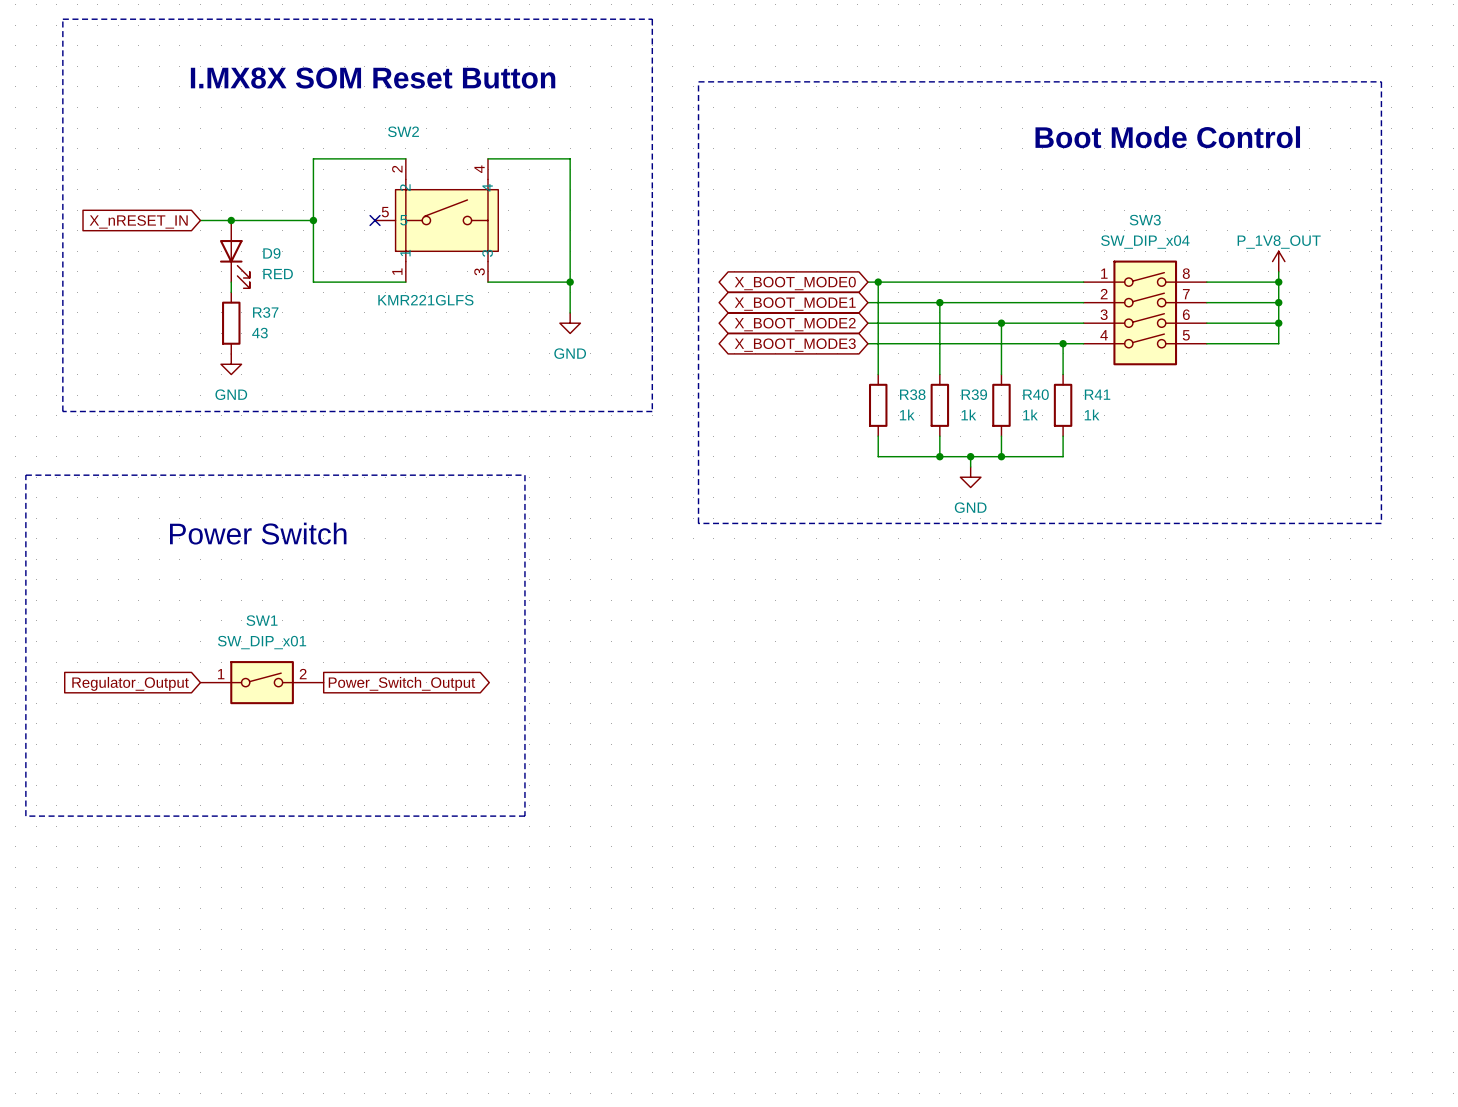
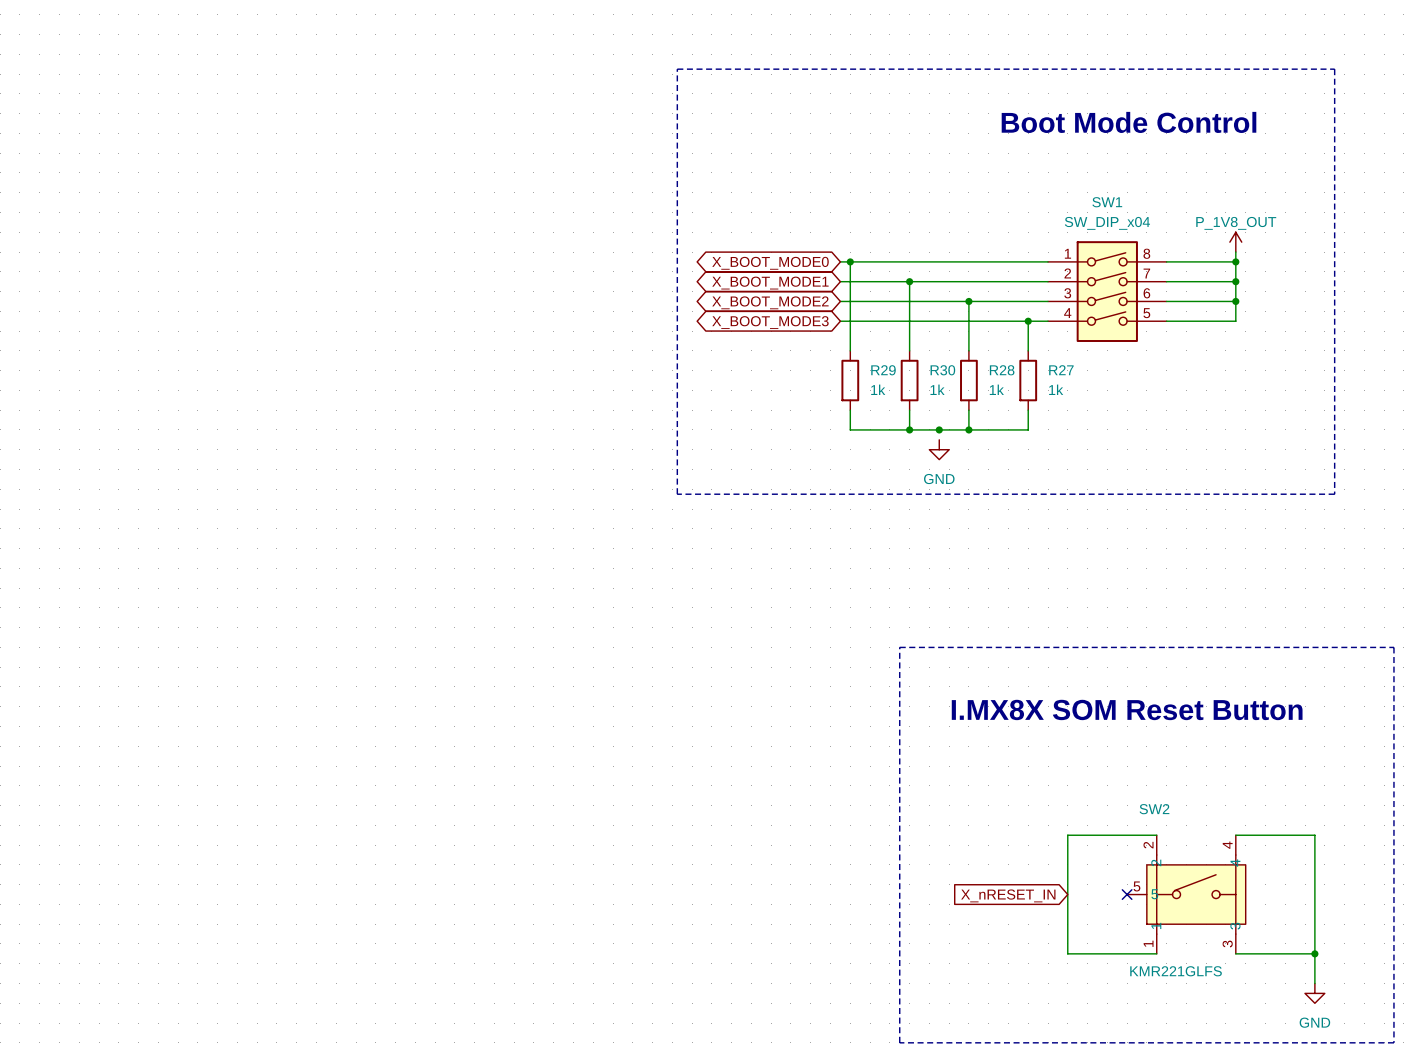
line: (62, 19) (652, 19) (652, 411) (62, 411) (62, 19) -> none
text: I.MX8X SOM Reset Button (373, 78) -> none
wire: (405, 158) (313, 158) (313, 282) (405, 282) -> none
wire: (488, 158) (570, 158) (570, 312) -> none
wire: (200, 220) (313, 220) -> none
junction: (231, 220) -> none
junction: (313, 220) -> none
no-connect mark: (375, 220) -> none
SW2 position: (436, 220) -> (1186, 894)
SW3 name: SW3 (1145, 220) -> SW1 (1107, 202)
global label: X_nRESET_IN (138, 221) -> none
D9: RED (234, 254) -> none
wire: (231, 282) (231, 292) -> none
wire: (488, 282) (570, 282) -> none
junction: (570, 282) -> none
R37: 43 (231, 323) -> none
power symbol: GND (570, 323) -> none
power symbol: GND (231, 364) -> none
R38 name: R38 (912, 394) -> R29 (883, 370)
R39 name: R39 (974, 394) -> R30 (942, 370)
R40 name: R40 (1036, 394) -> R28 (1002, 370)
R41 name: R41 (1097, 394) -> R27 (1061, 370)
wire: (970, 456) (970, 466) -> none
line: (25, 475) (524, 475) (524, 816) (25, 816) (25, 475) -> none
text: Power Switch (258, 533) -> none
SW1: SW_DIP_x01 (262, 682) -> none
line: none -> (899, 647) (1393, 647) (1393, 1042) (899, 1042) (899, 647)
global label: Regulator_Output (130, 683) -> none
global label: Power_Switch_Output (401, 683) -> none
text: none -> I.MX8X SOM Reset Button (1127, 709)
wire: none -> (1156, 835) (1067, 835) (1067, 953) (1156, 953)
wire: none -> (1235, 835) (1314, 835) (1314, 983)
no-connect mark: none -> (1127, 894)
global label: none -> X_nRESET_IN (1008, 895)
wire: none -> (1235, 953) (1314, 953)
junction: none -> (1314, 953)
power symbol: none -> GND (1314, 993)

